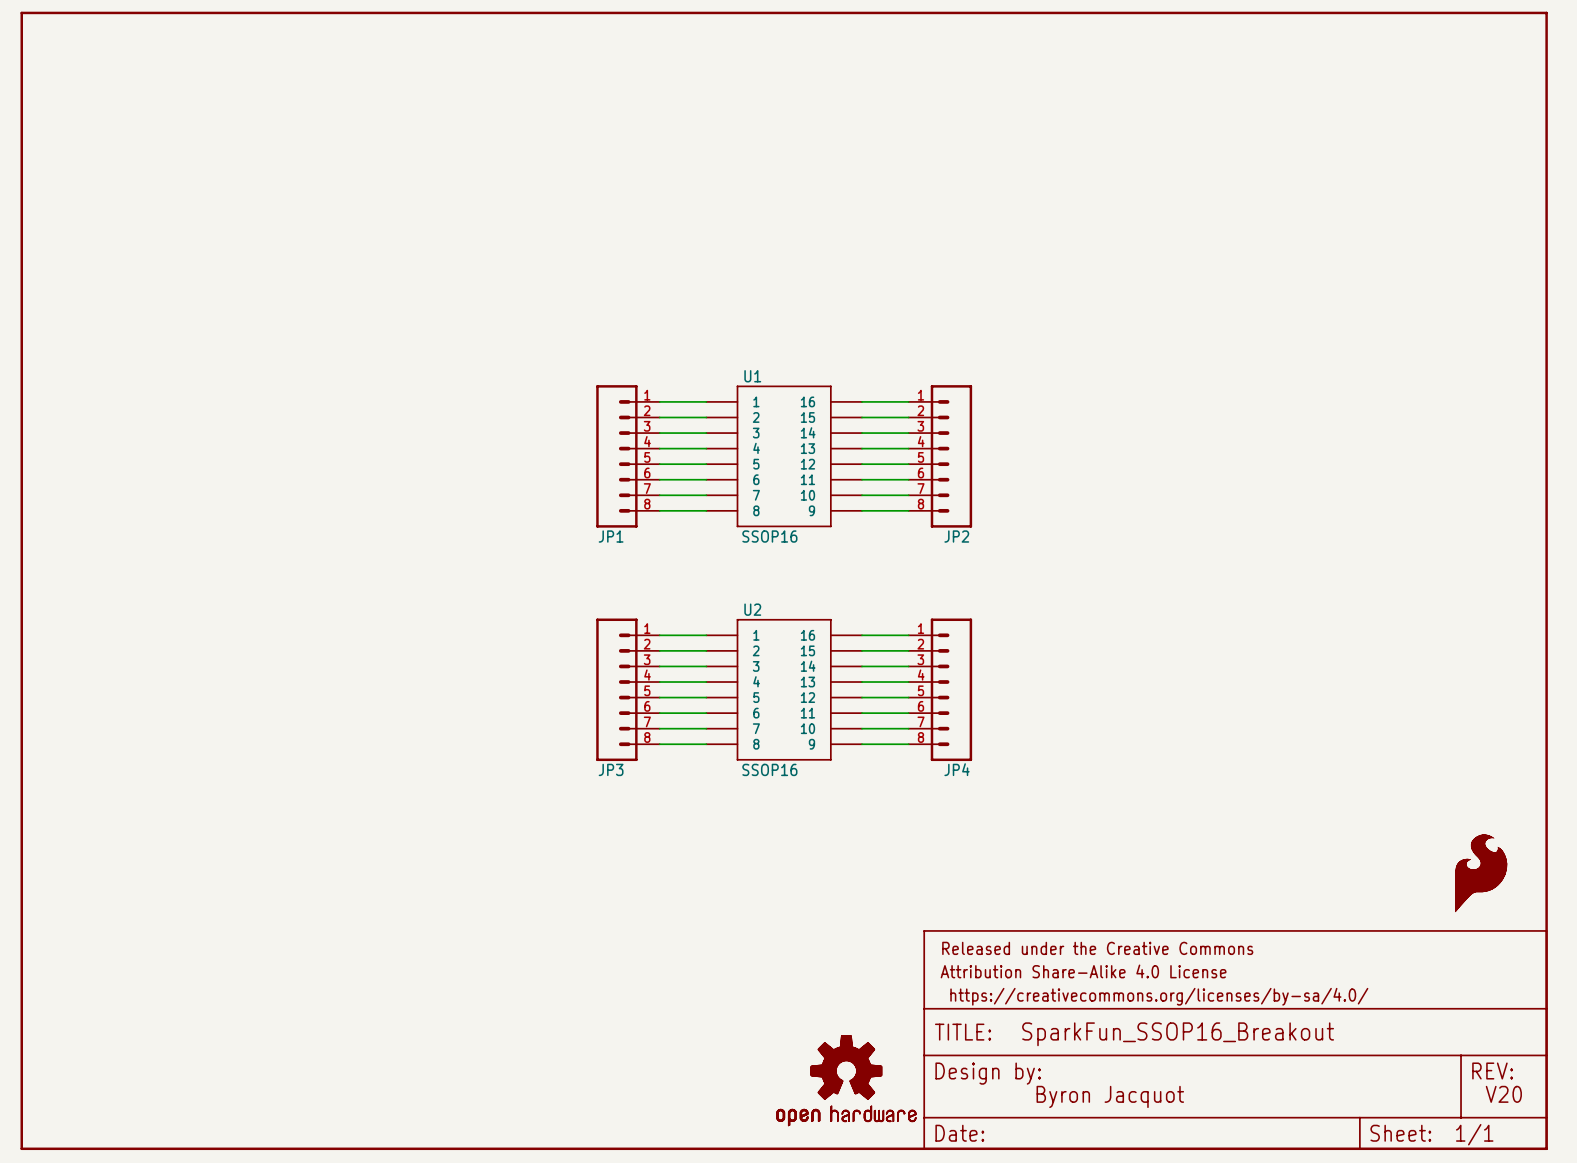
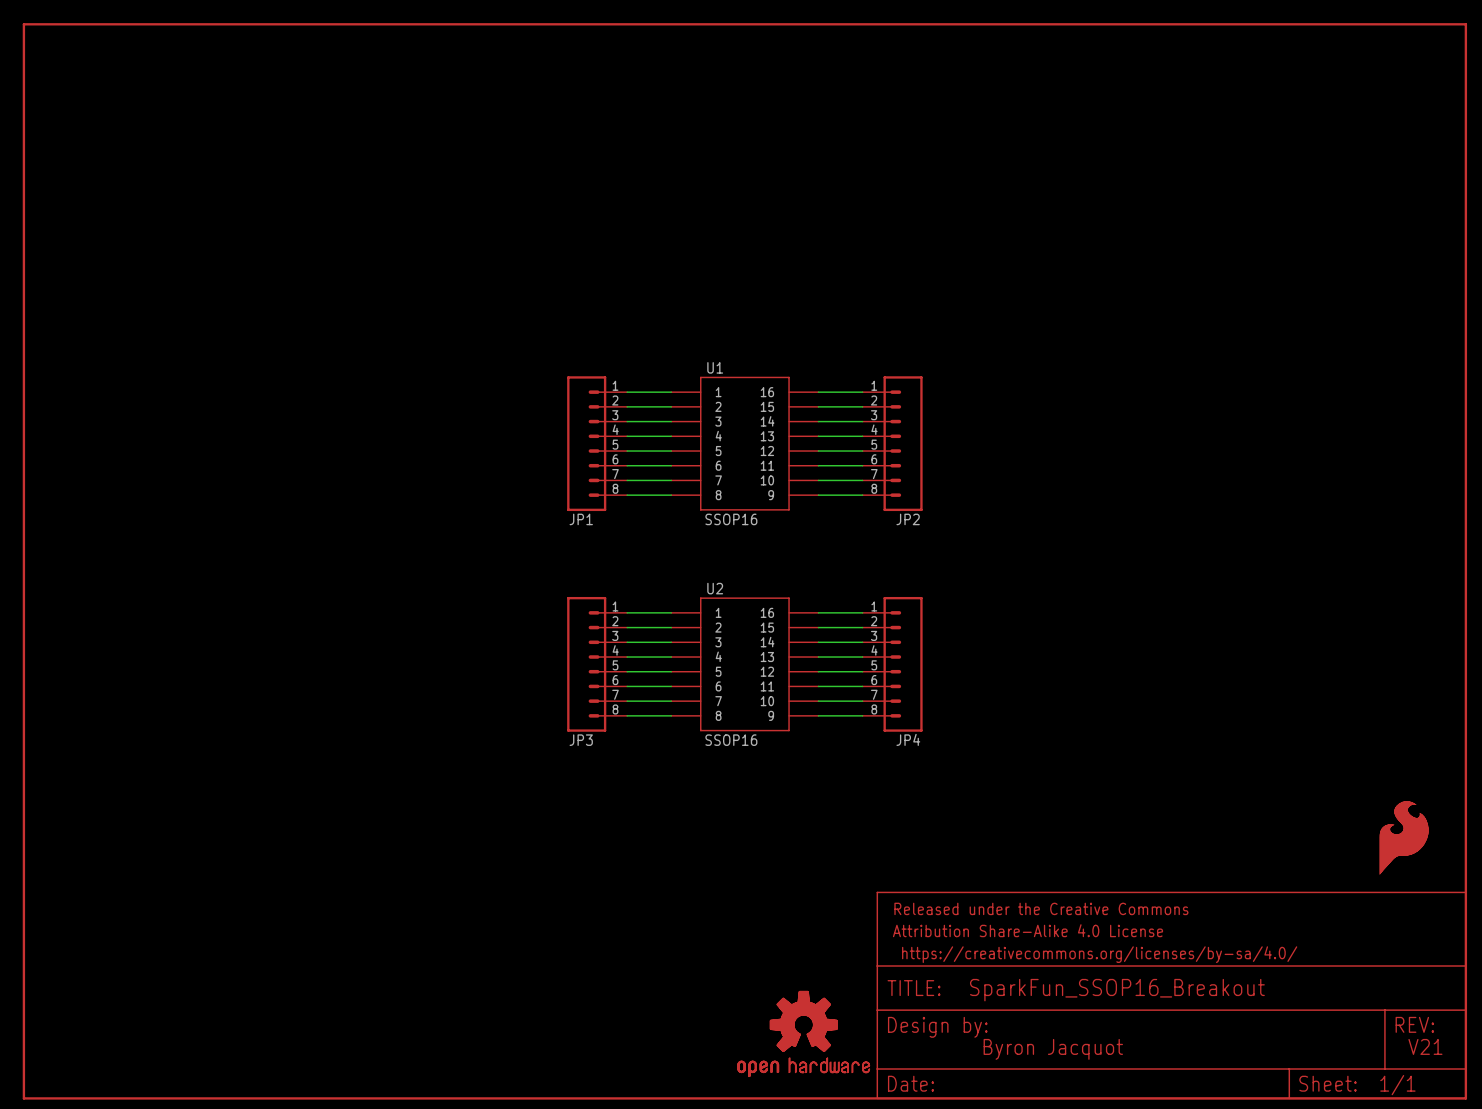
text: V20 (1503, 1094) -> V21 (1425, 1046)

